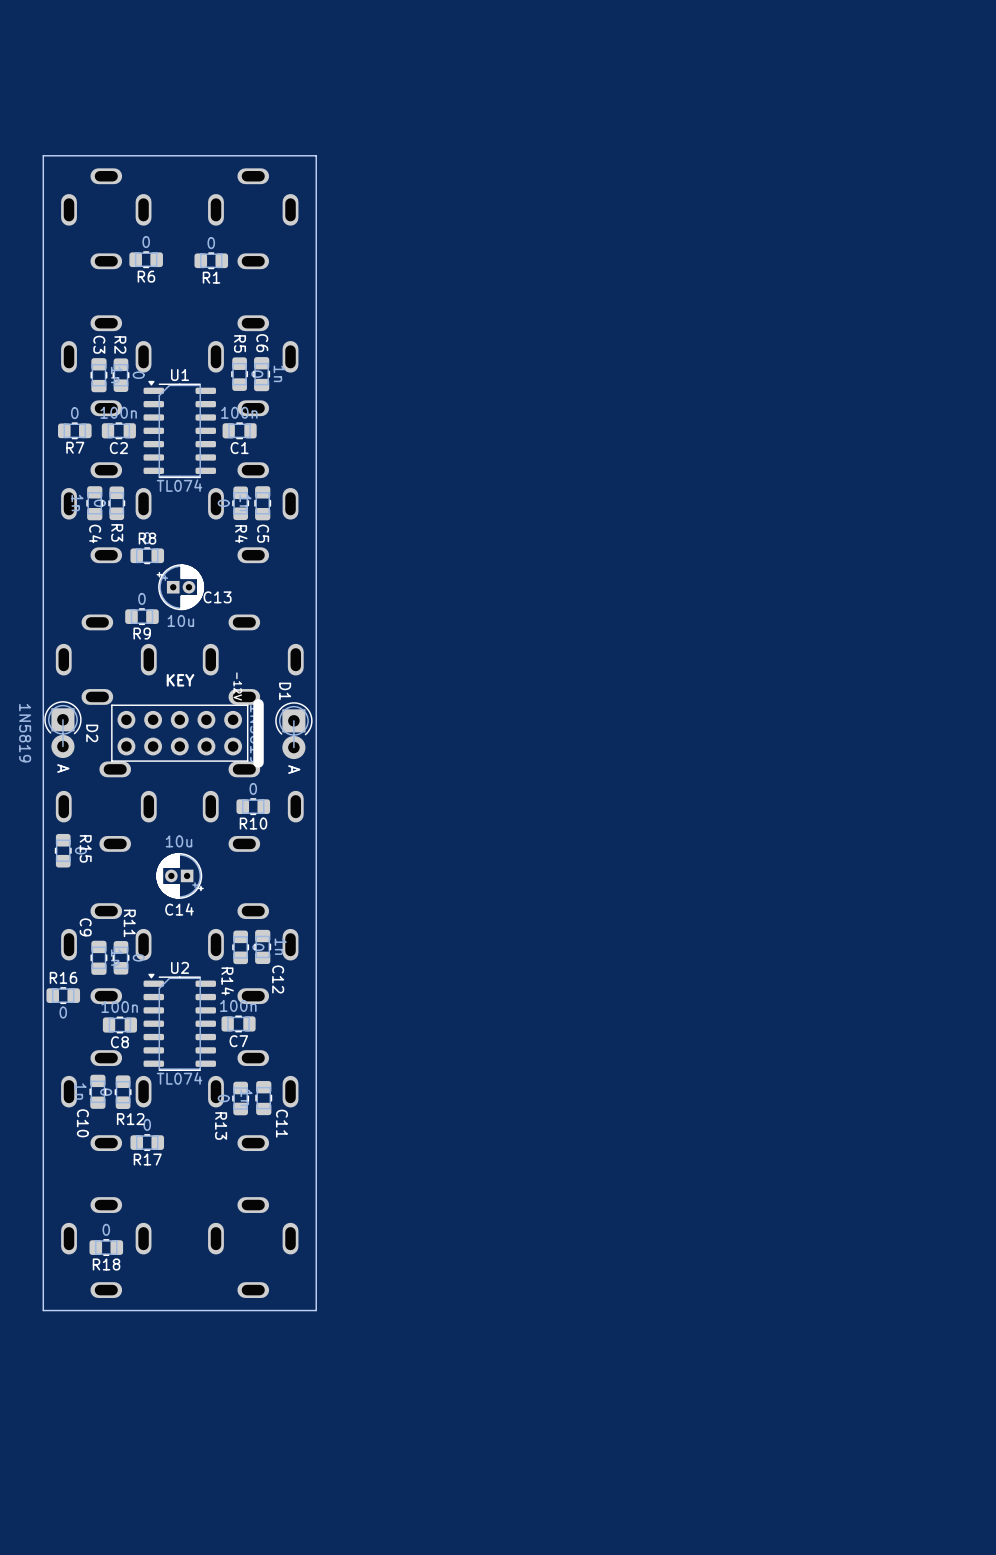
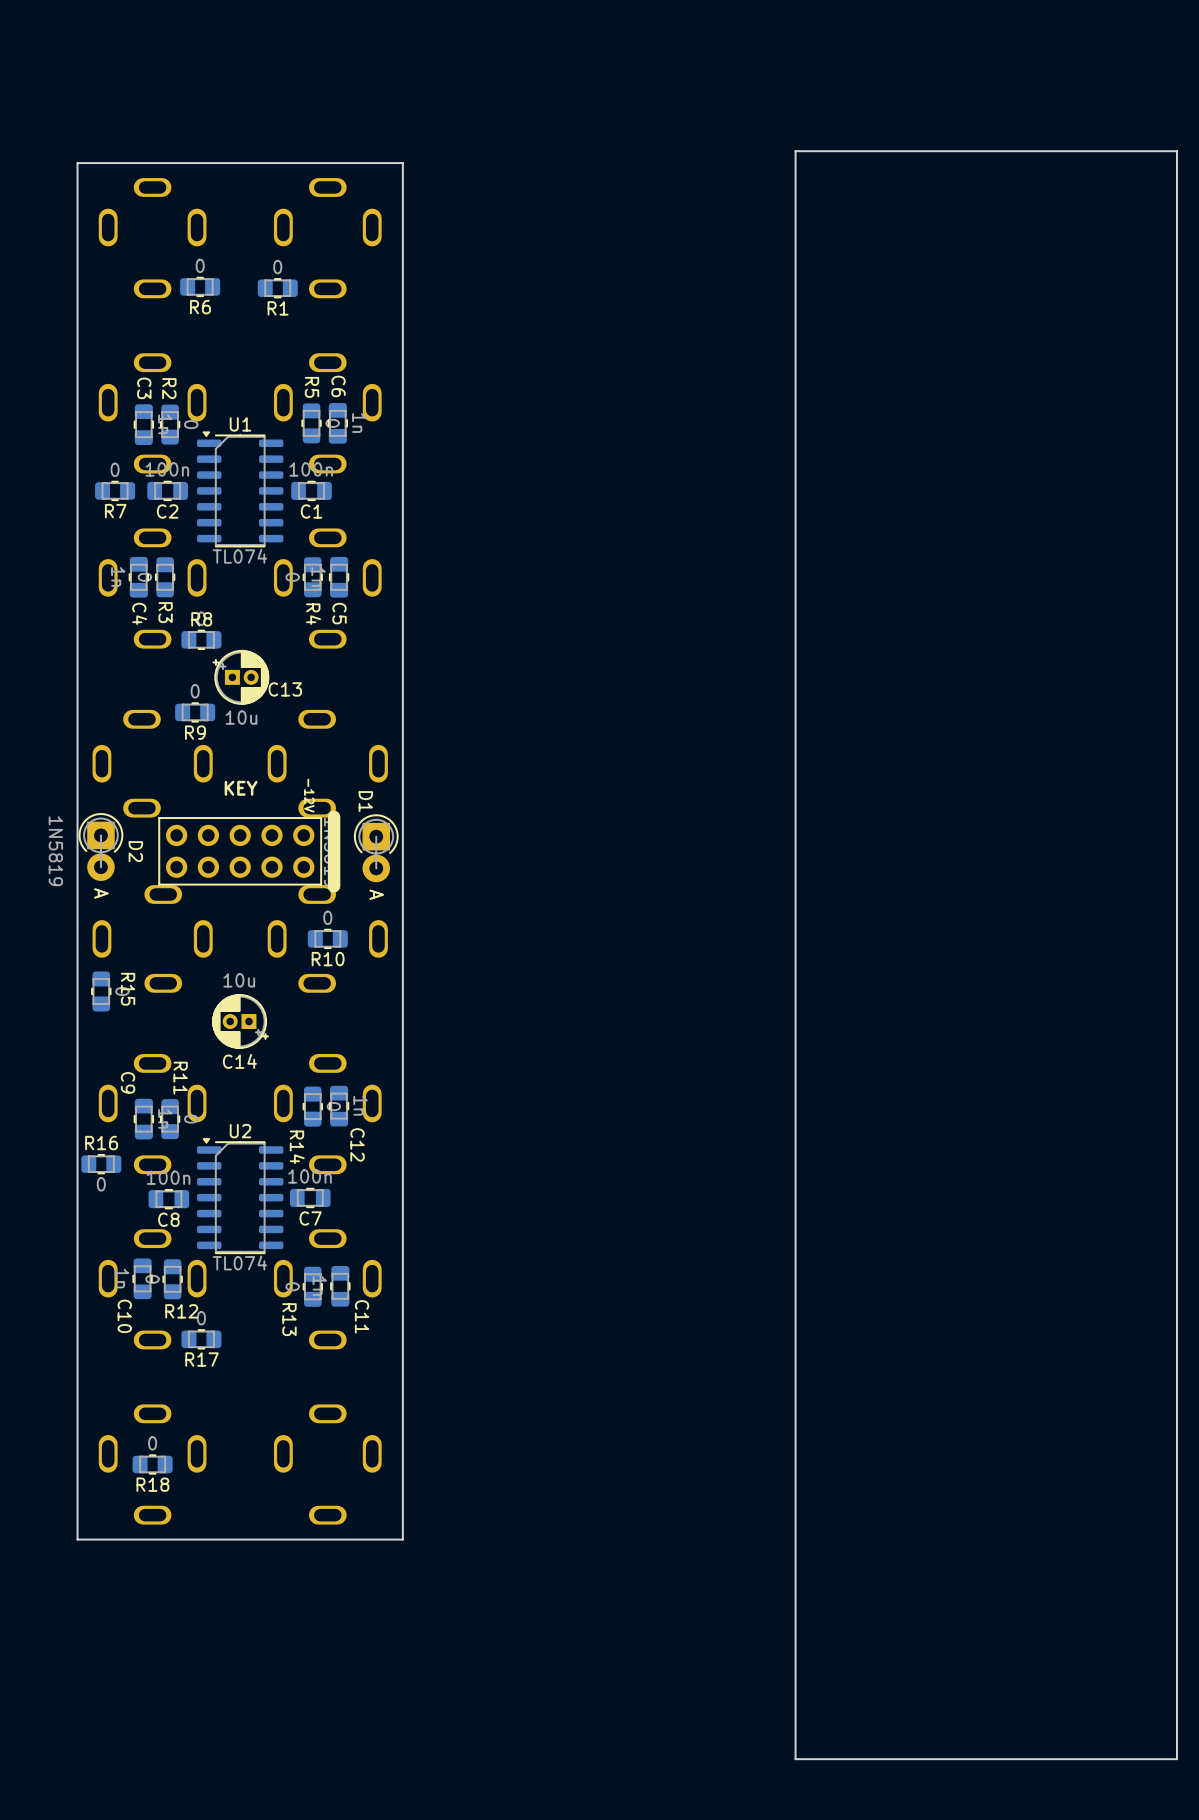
board edge: none -> (1176, 151) (795, 151) (795, 1759) (1176, 1759) (1176, 151)

